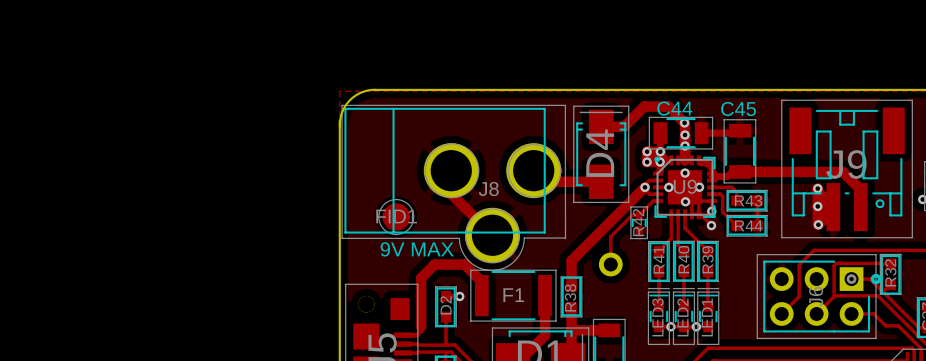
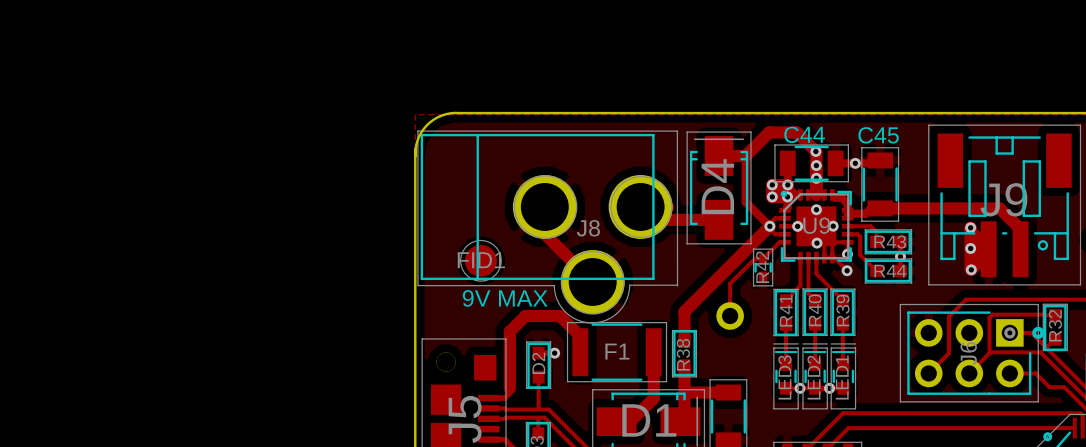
track: none -> (745, 156) (745, 202) (769, 226)
via: none -> (855, 163)
via: none -> (900, 256)

